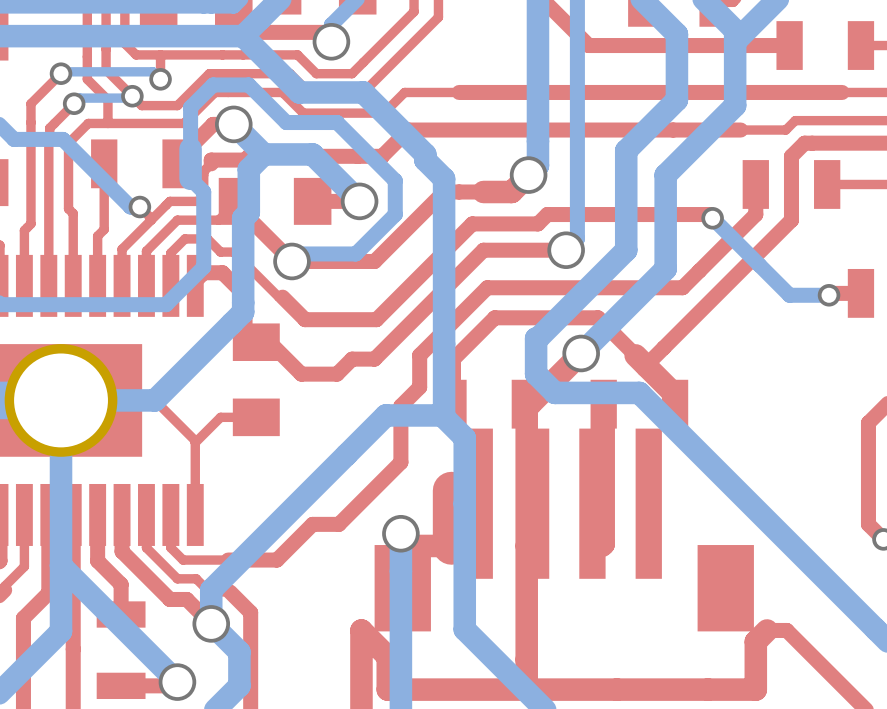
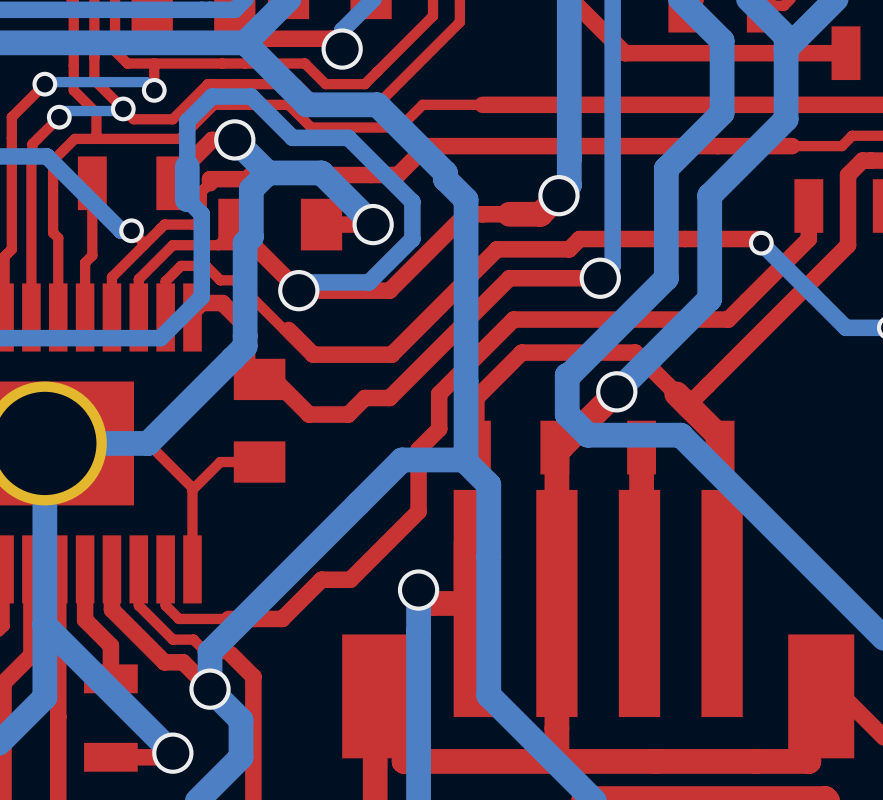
part footprint: [374, 428, 754, 632] -> [342, 489, 855, 759]

